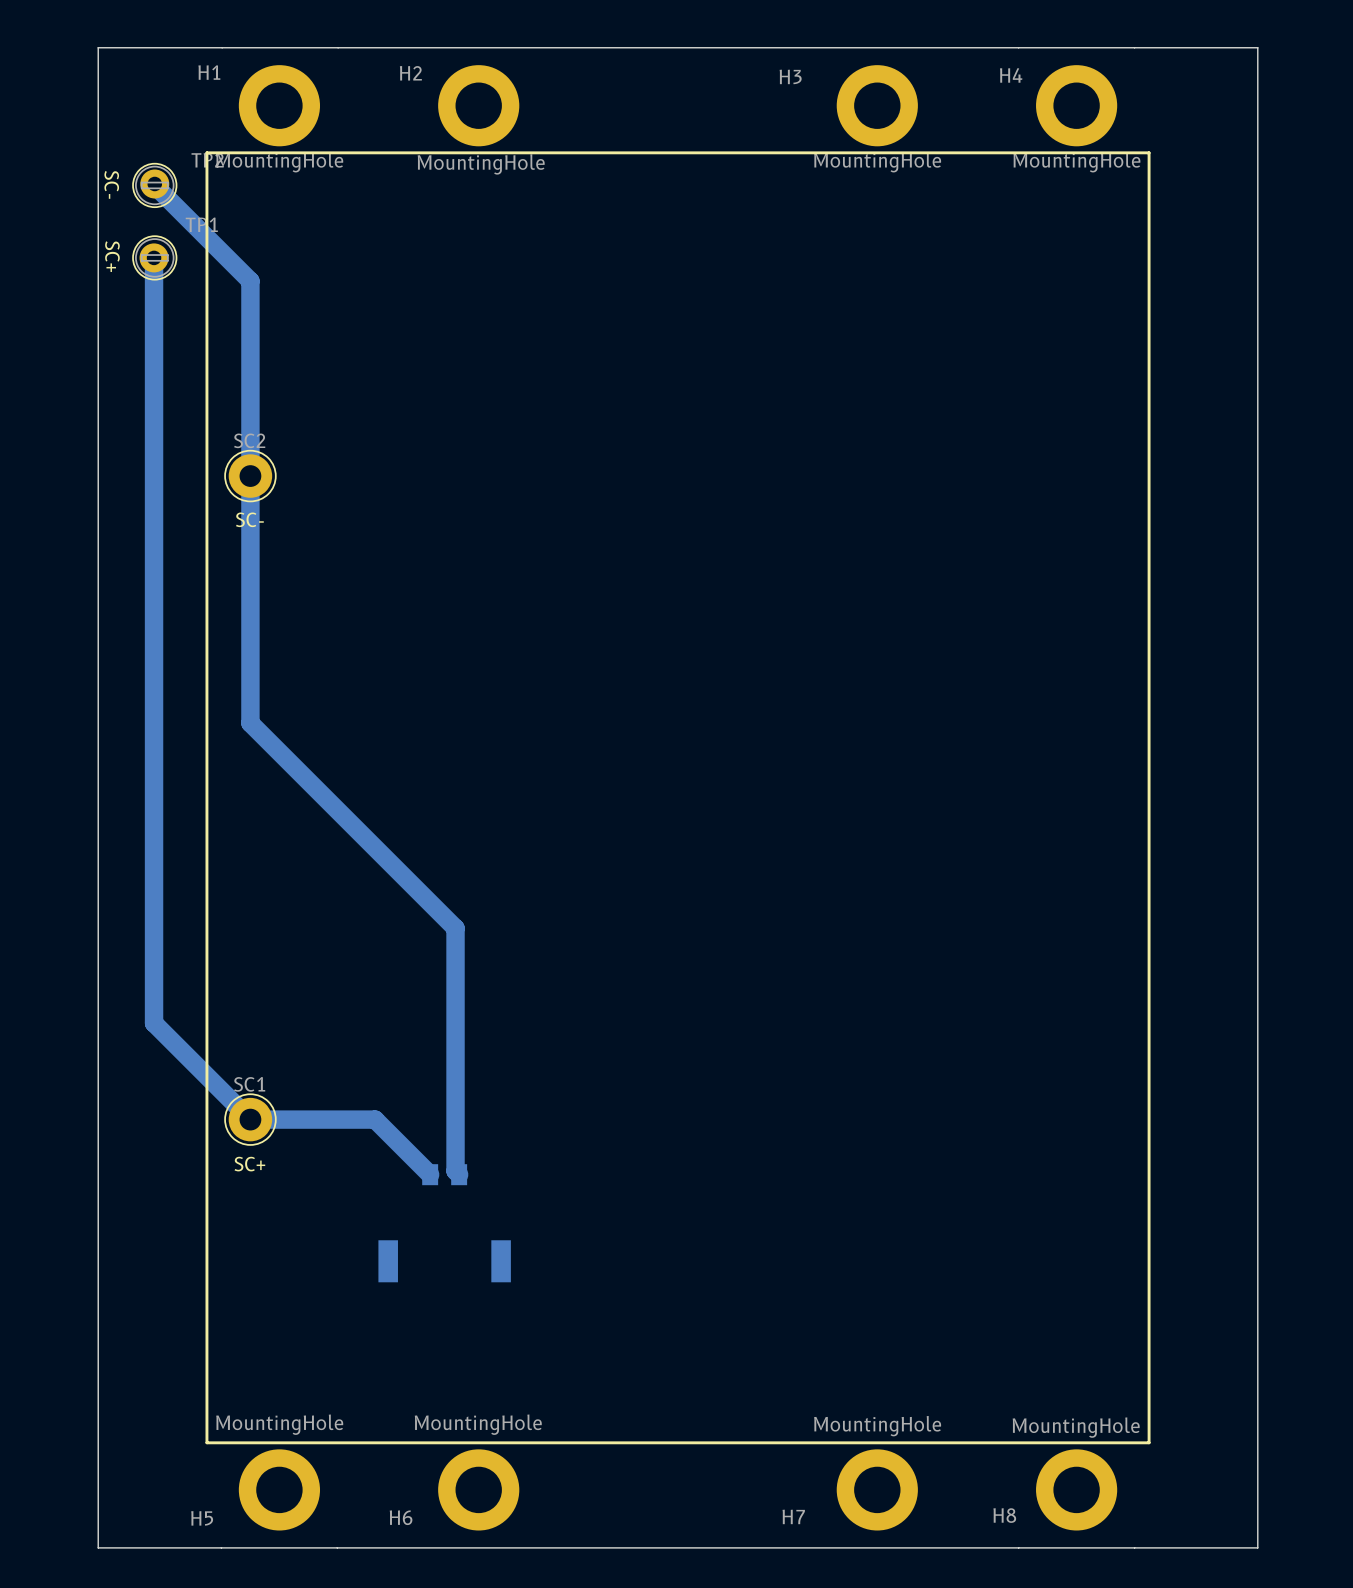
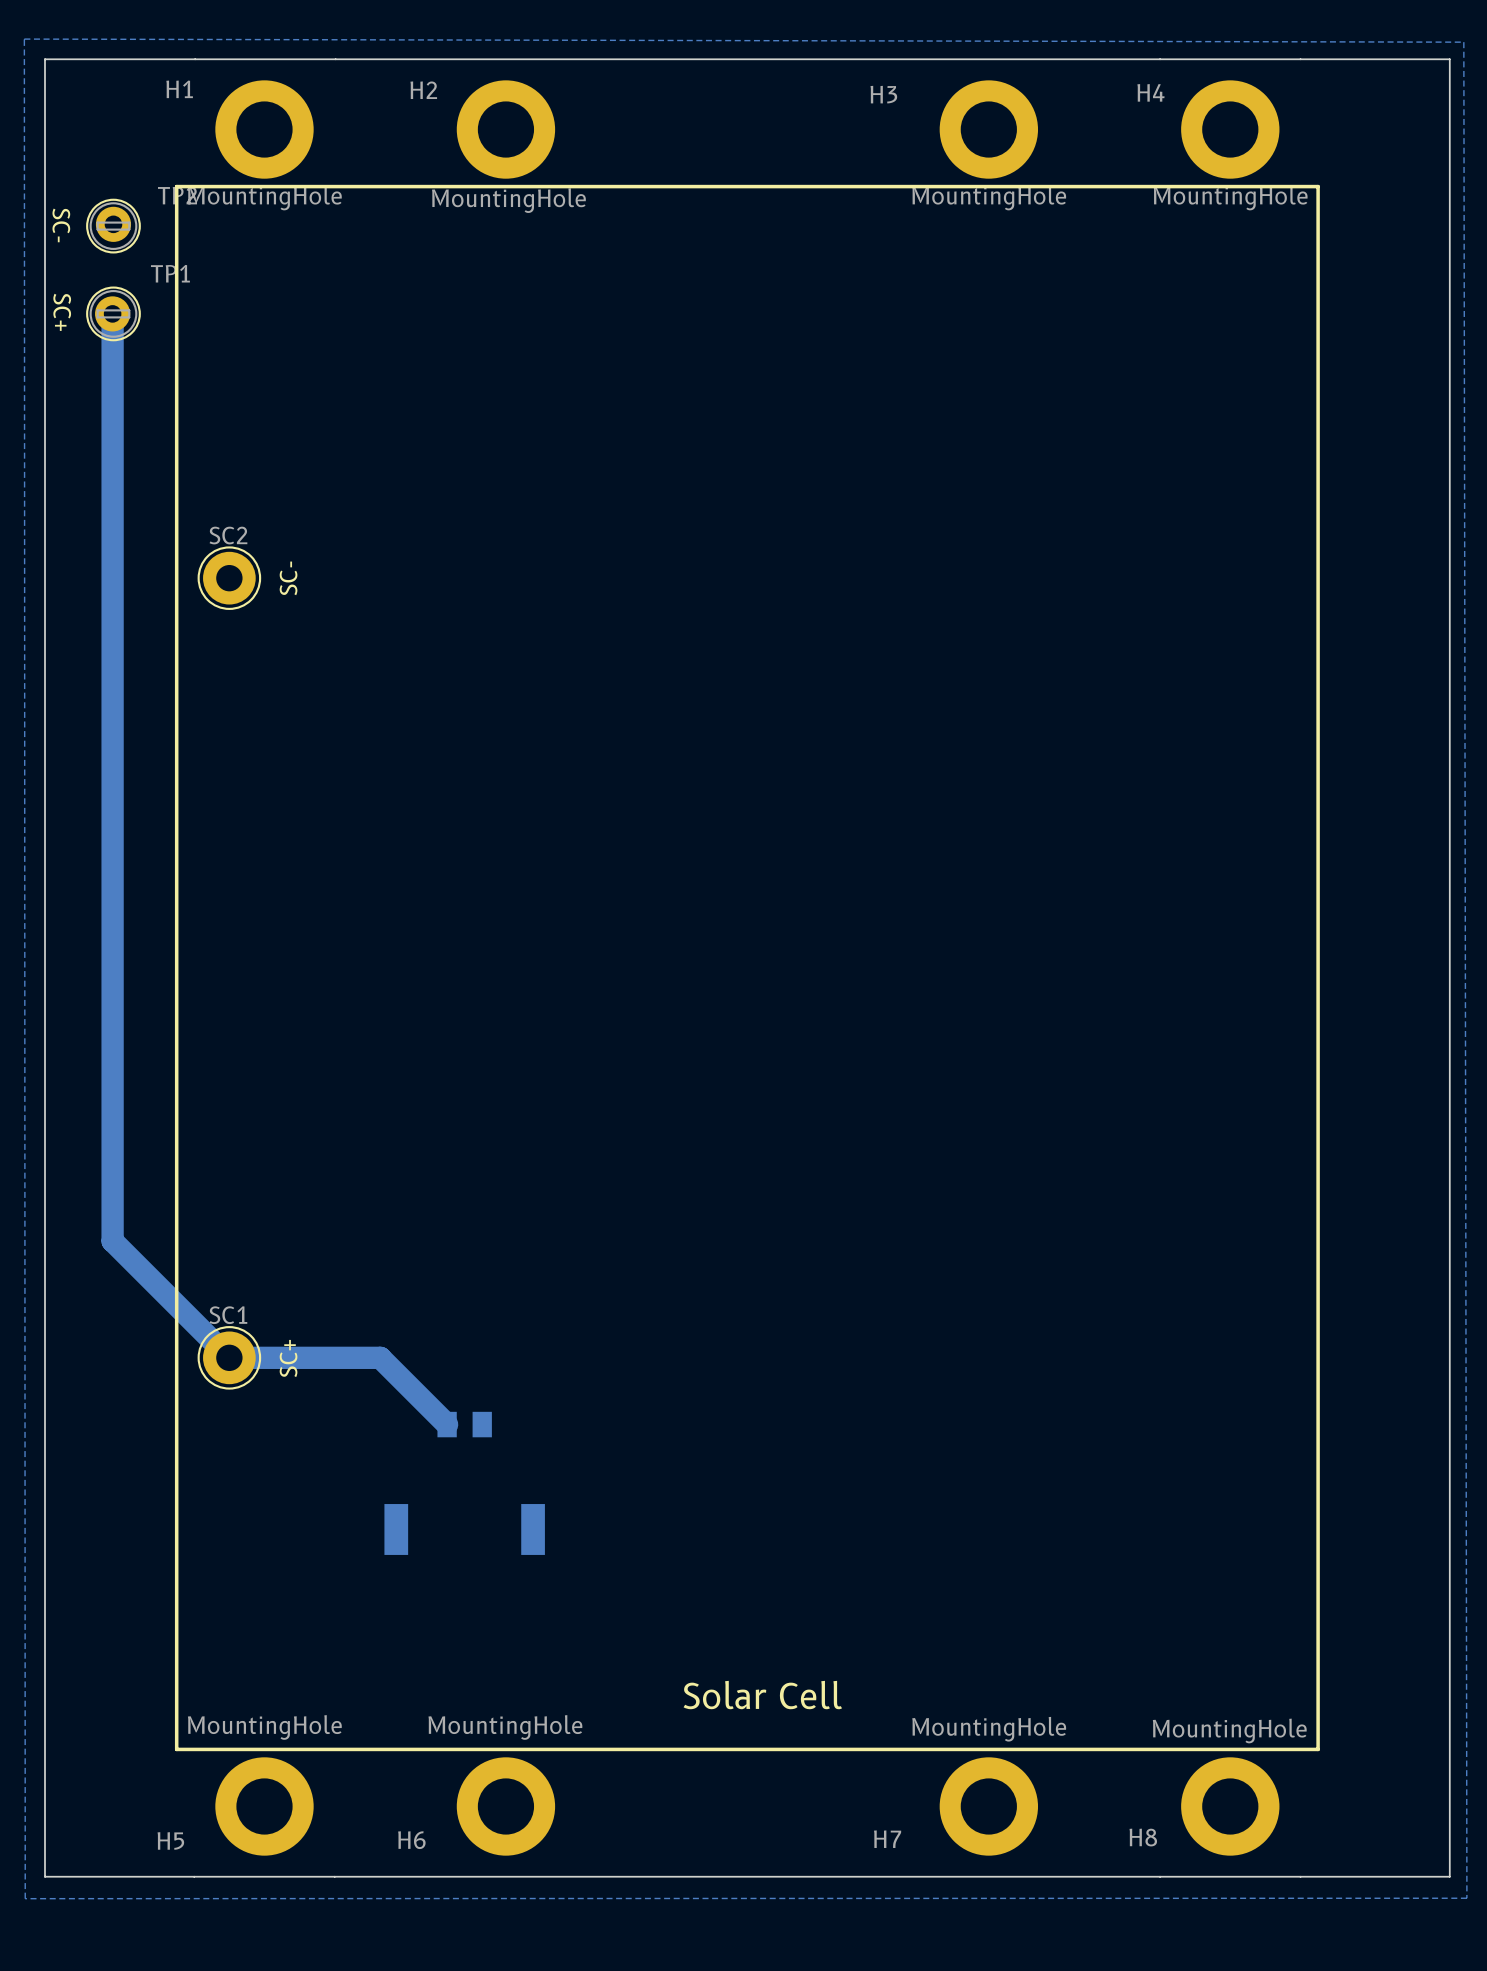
bottom zone outline: none -> (24, 39) (25, 1898) (1466, 1898) (1463, 42) (24, 39)
bottom track: (154, 185) (250, 281) (250, 723) (455, 928) (455, 1171) (459, 1174) -> none
SC2 value rotation: 0° (249, 519) -> 90° counterclockwise (288, 578)
SC2 value position: SC- (249, 519) -> SC- (288, 578)
SC1 value rotation: 0° (249, 1164) -> 90° counterclockwise (288, 1358)
SC1 value position: SC+ (249, 1164) -> SC+ (288, 1358)
text: none -> Solar Cell (762, 1695)

